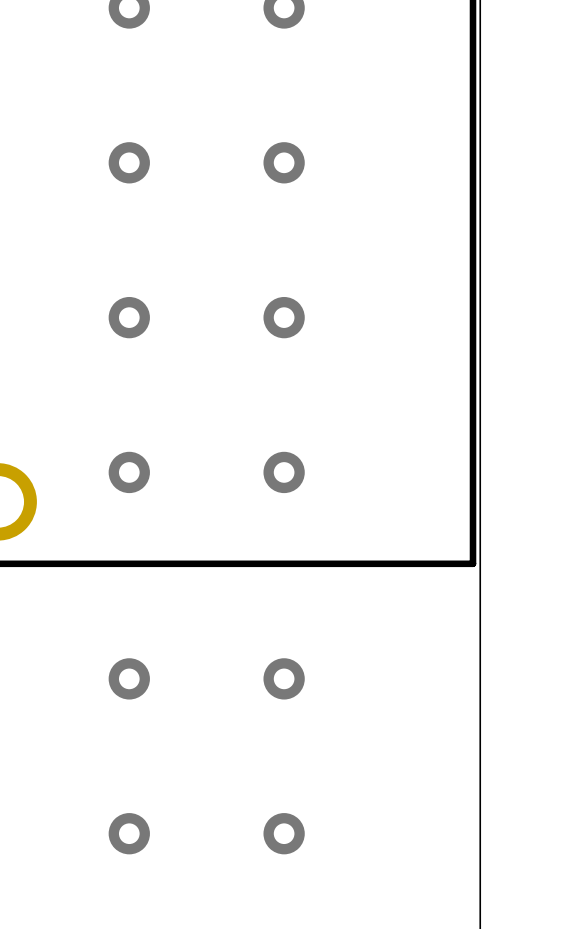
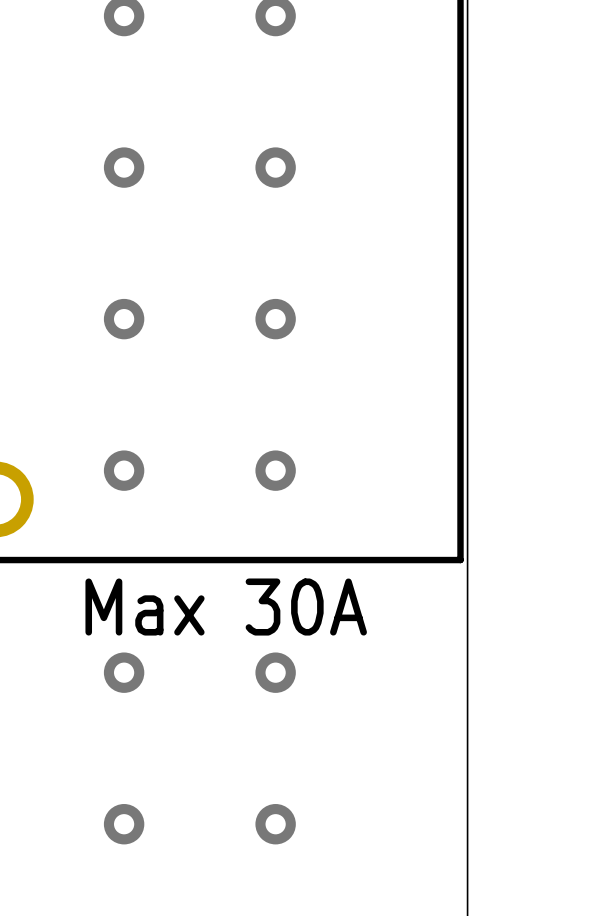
text: none -> Max 30A (226, 607)

